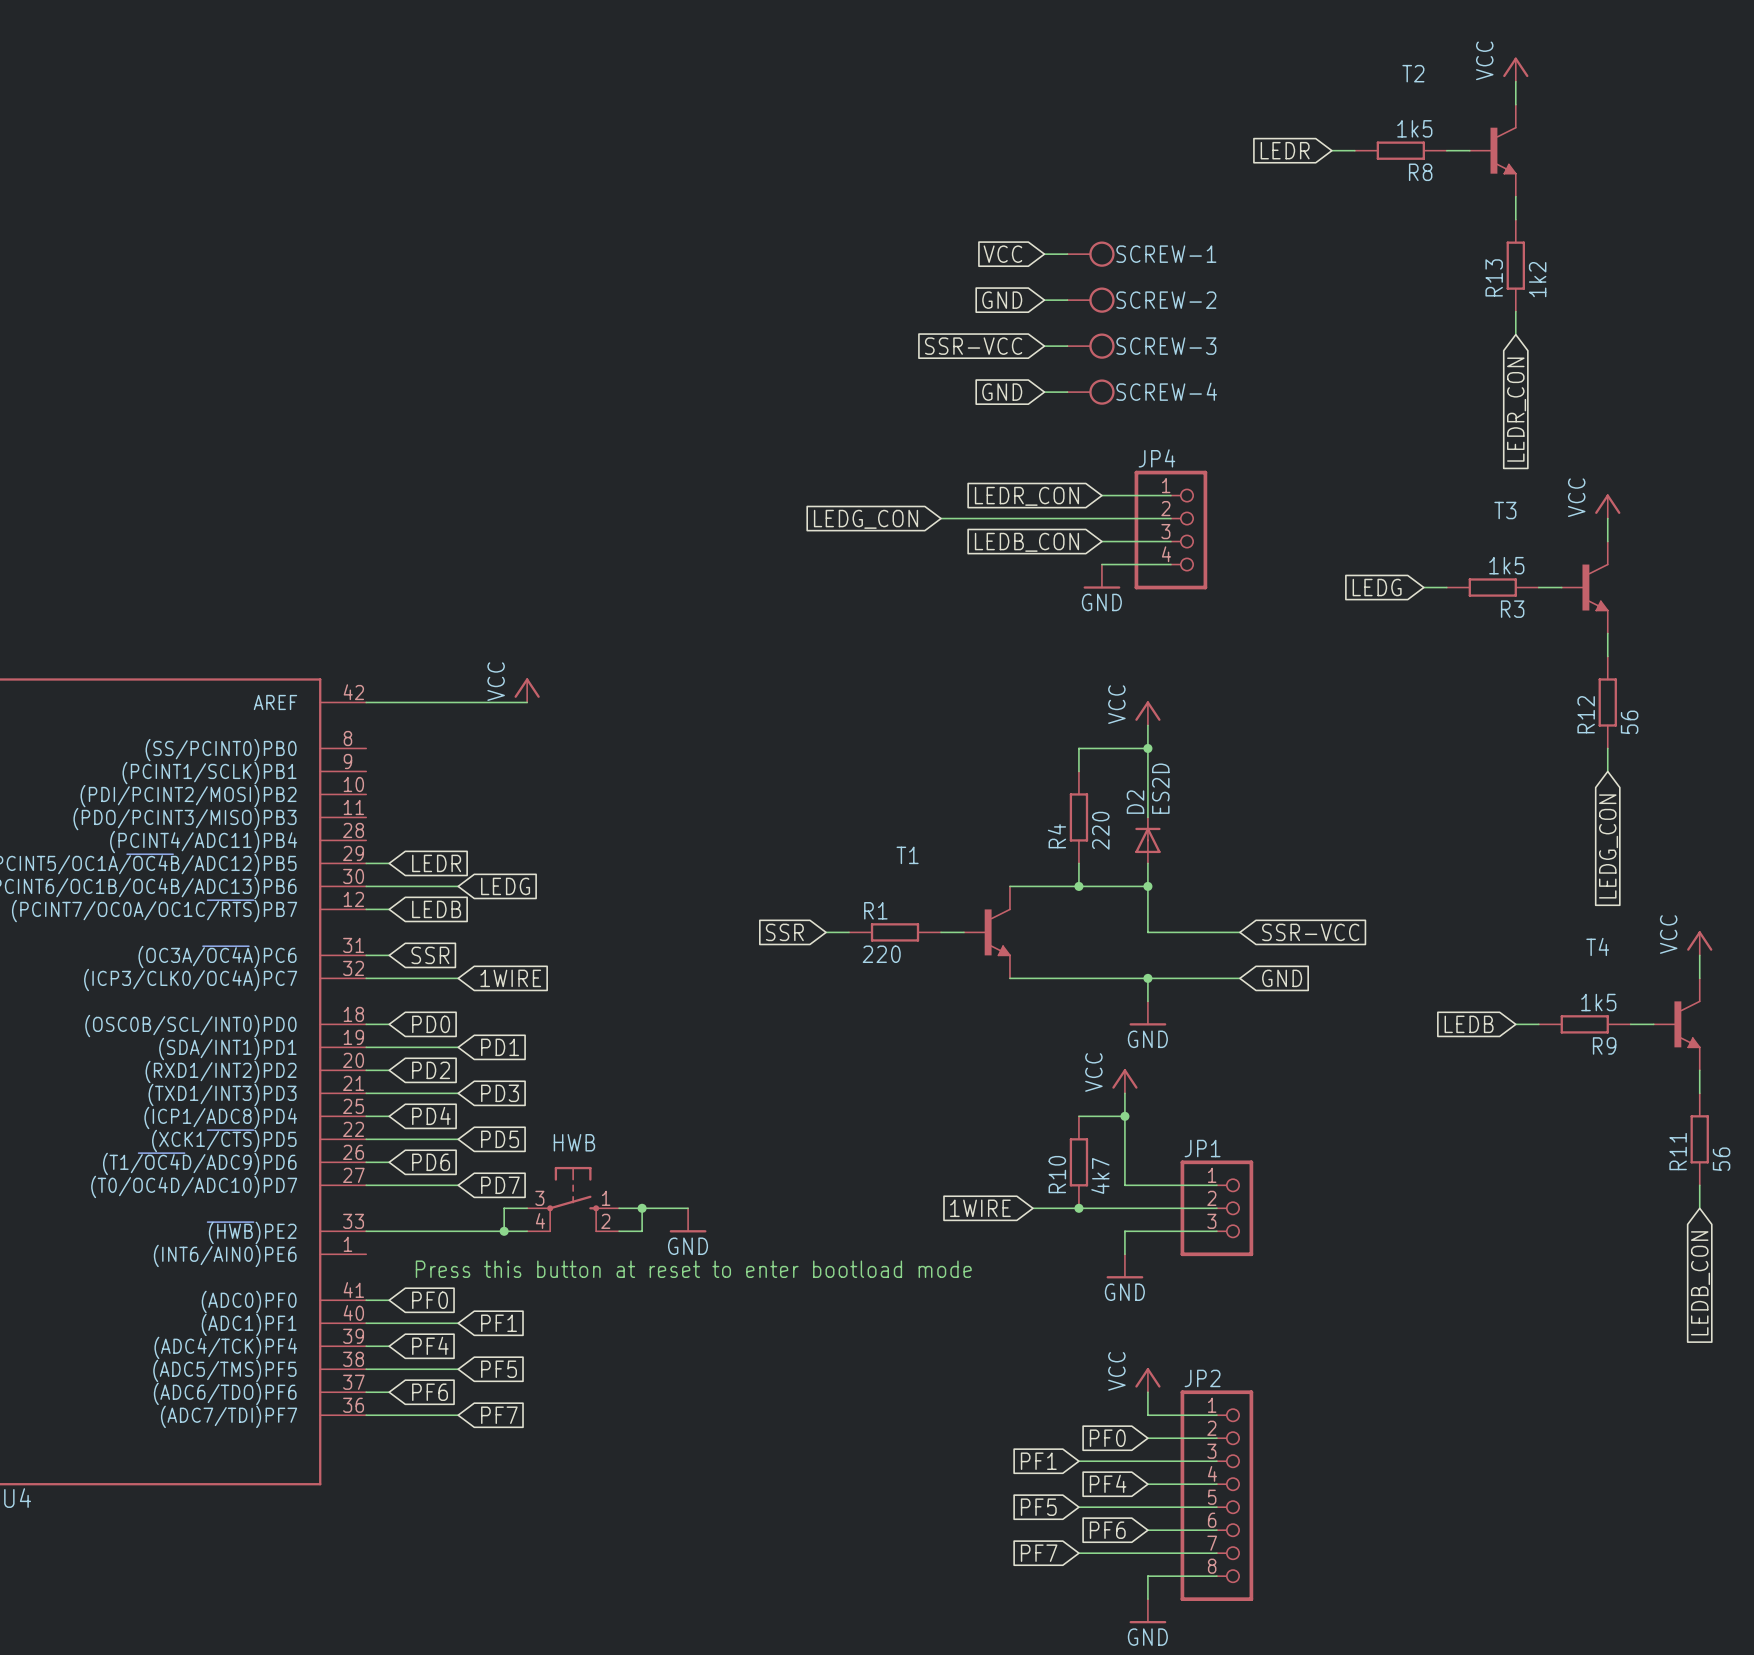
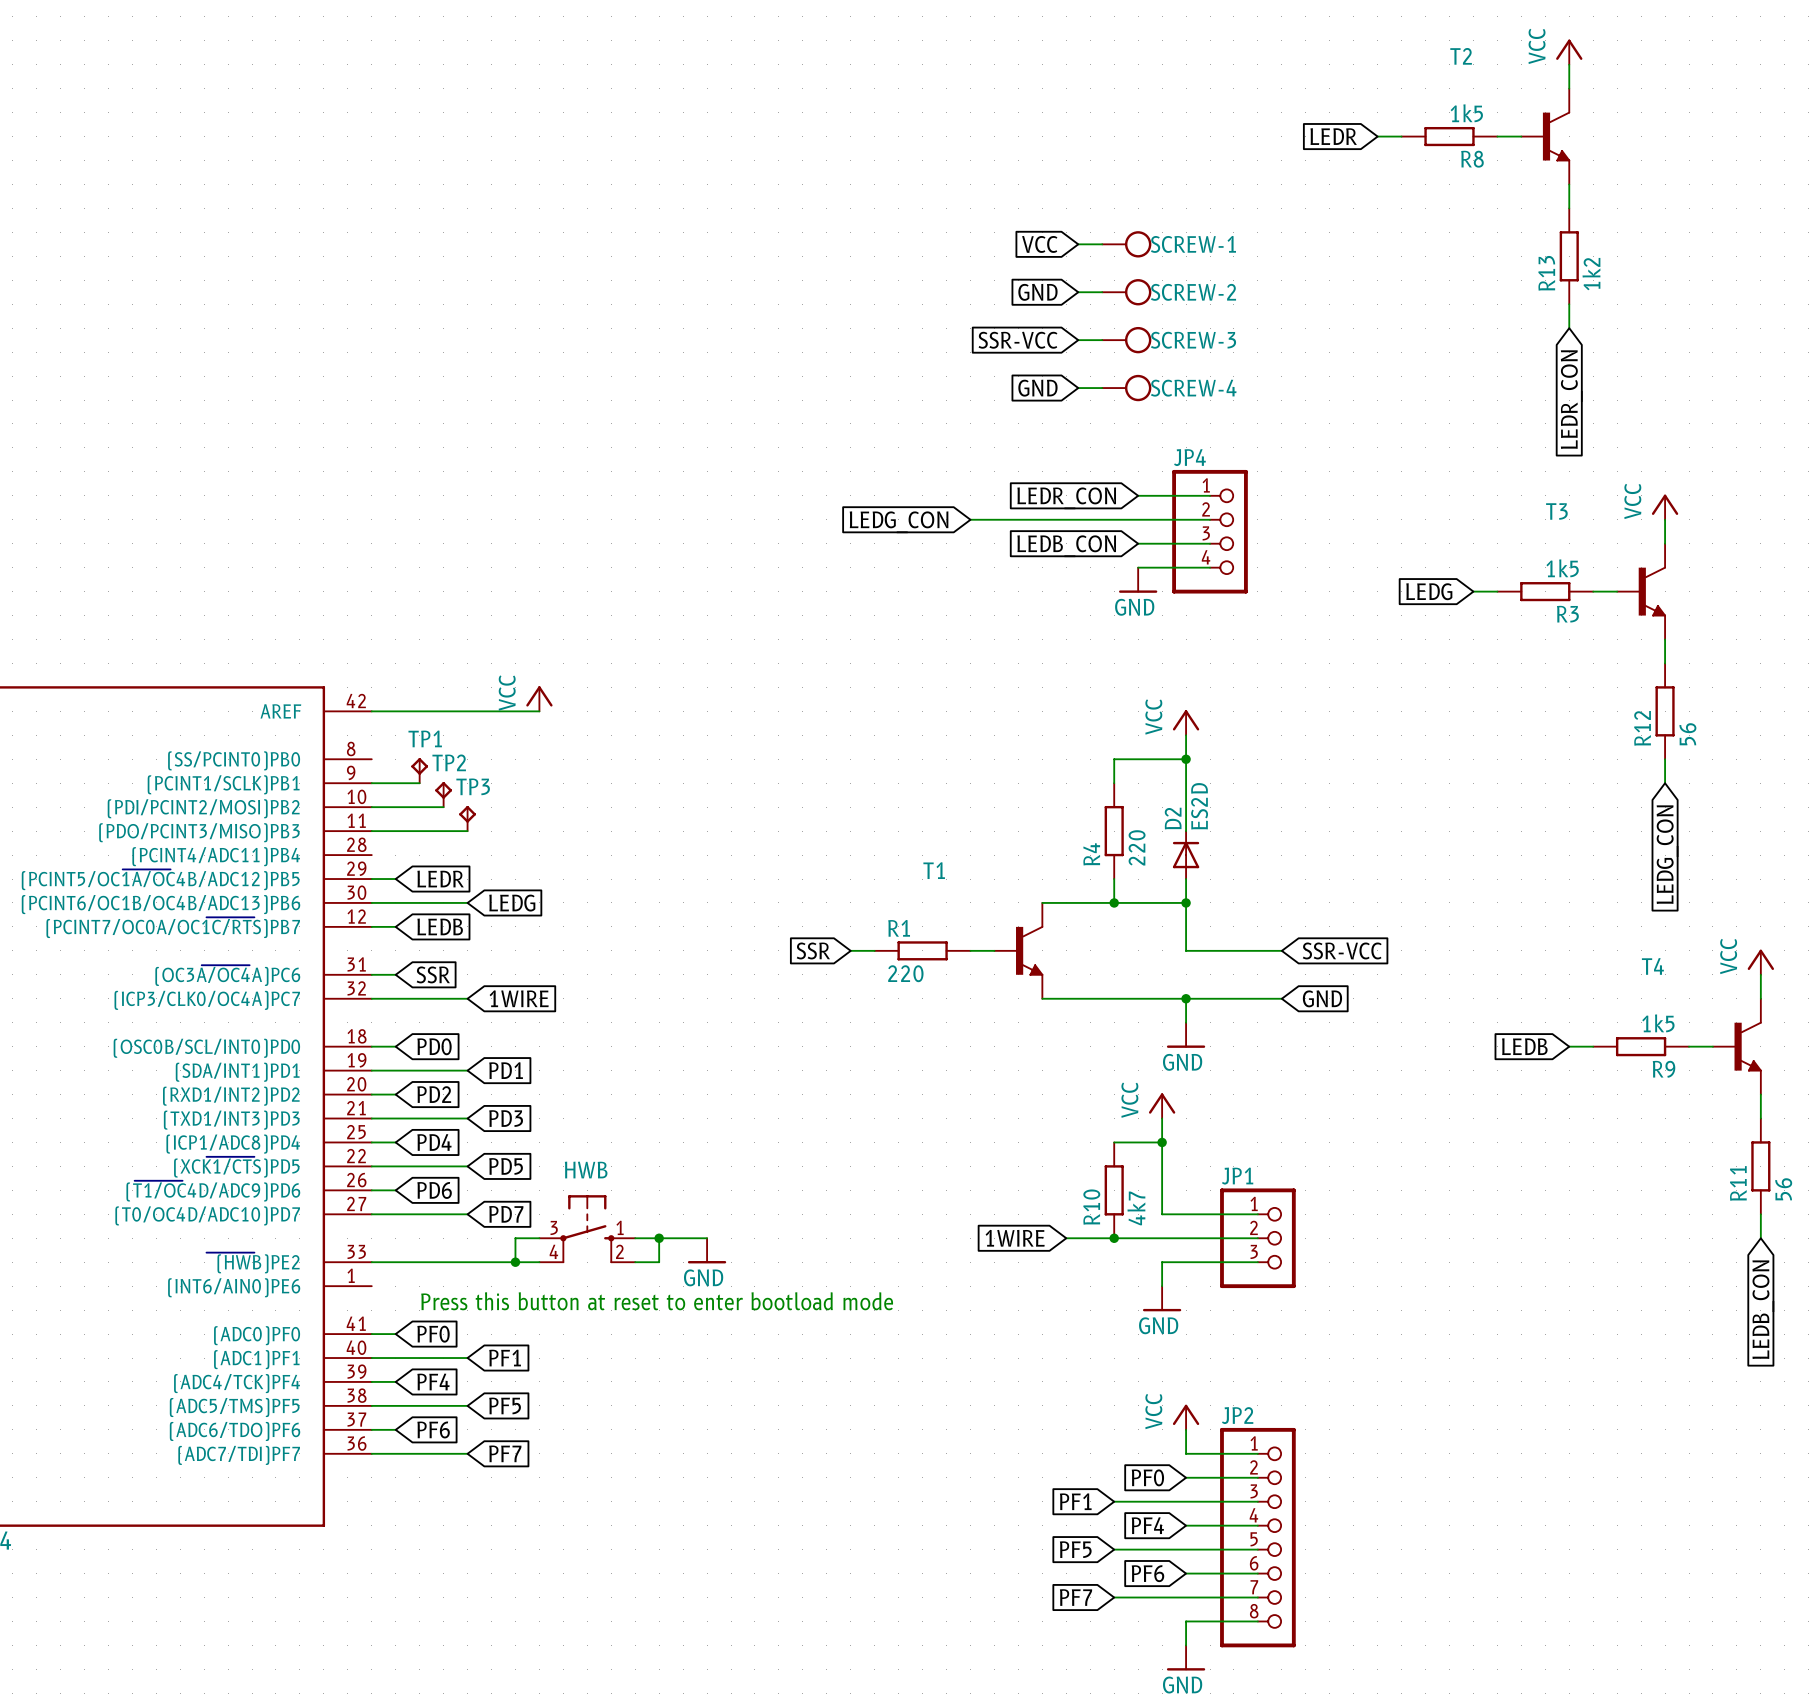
TP1: none -> (419, 770)
wire: none -> (371, 783) (419, 783)
TP2: none -> (443, 794)
wire: none -> (371, 807) (443, 807)
TP3: none -> (467, 818)
wire: none -> (371, 831) (467, 831)

